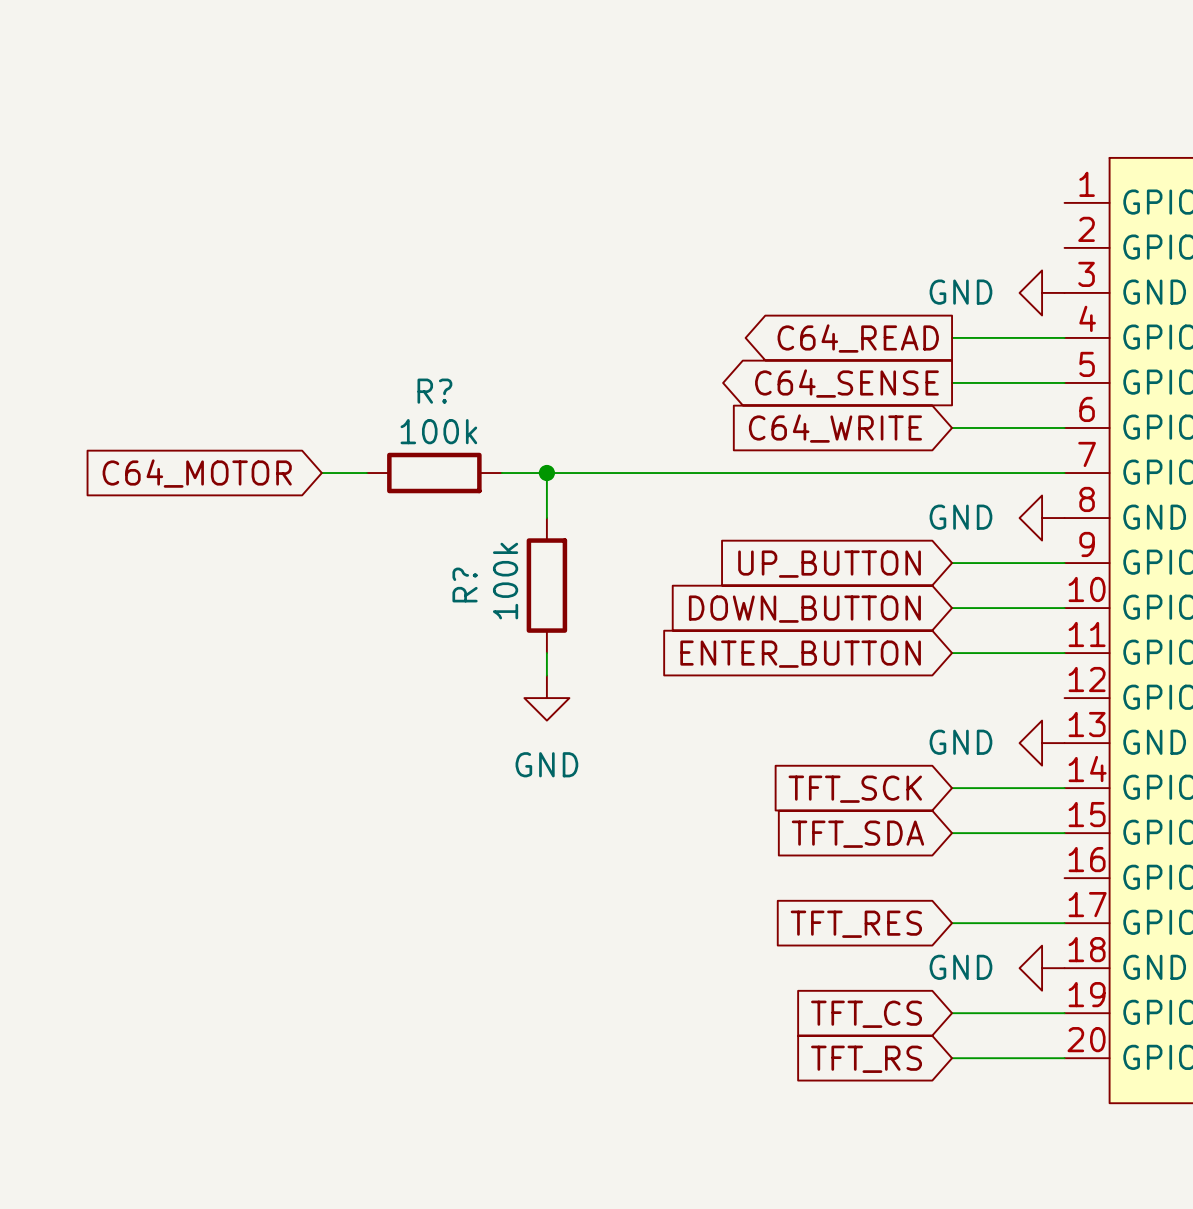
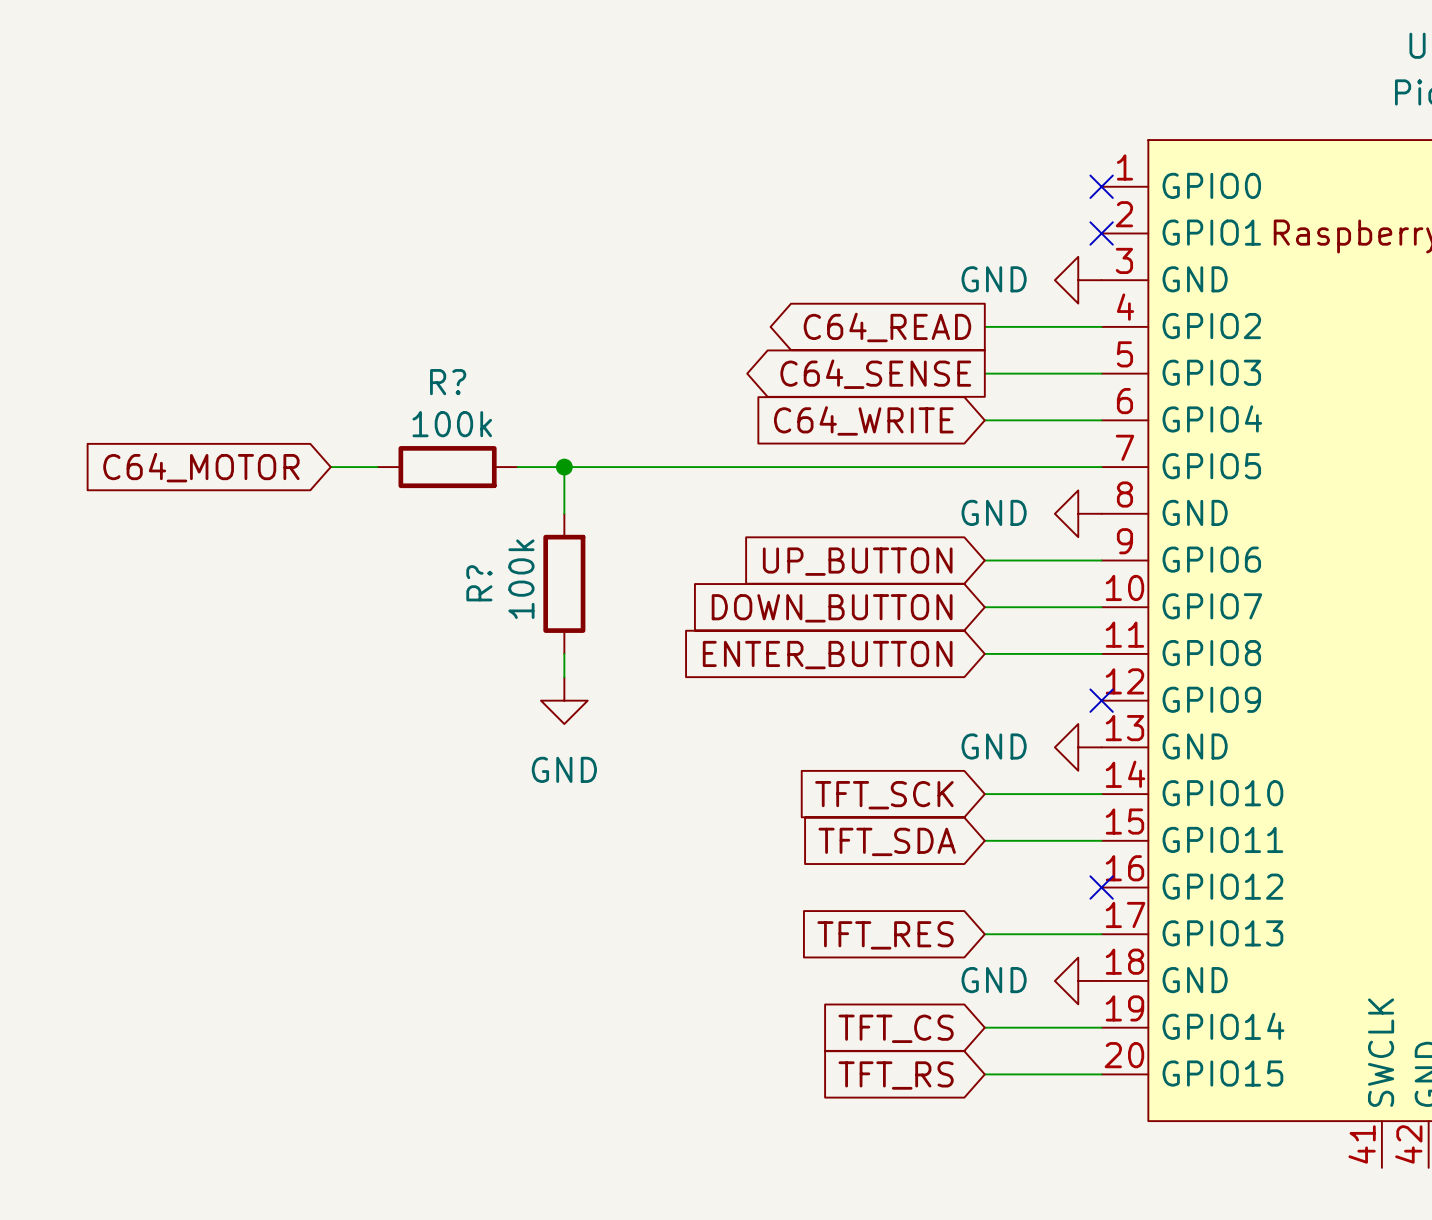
no-connect mark: none -> (1101, 186)
no-connect mark: none -> (1101, 233)
no-connect mark: none -> (1101, 700)
no-connect mark: none -> (1101, 887)

